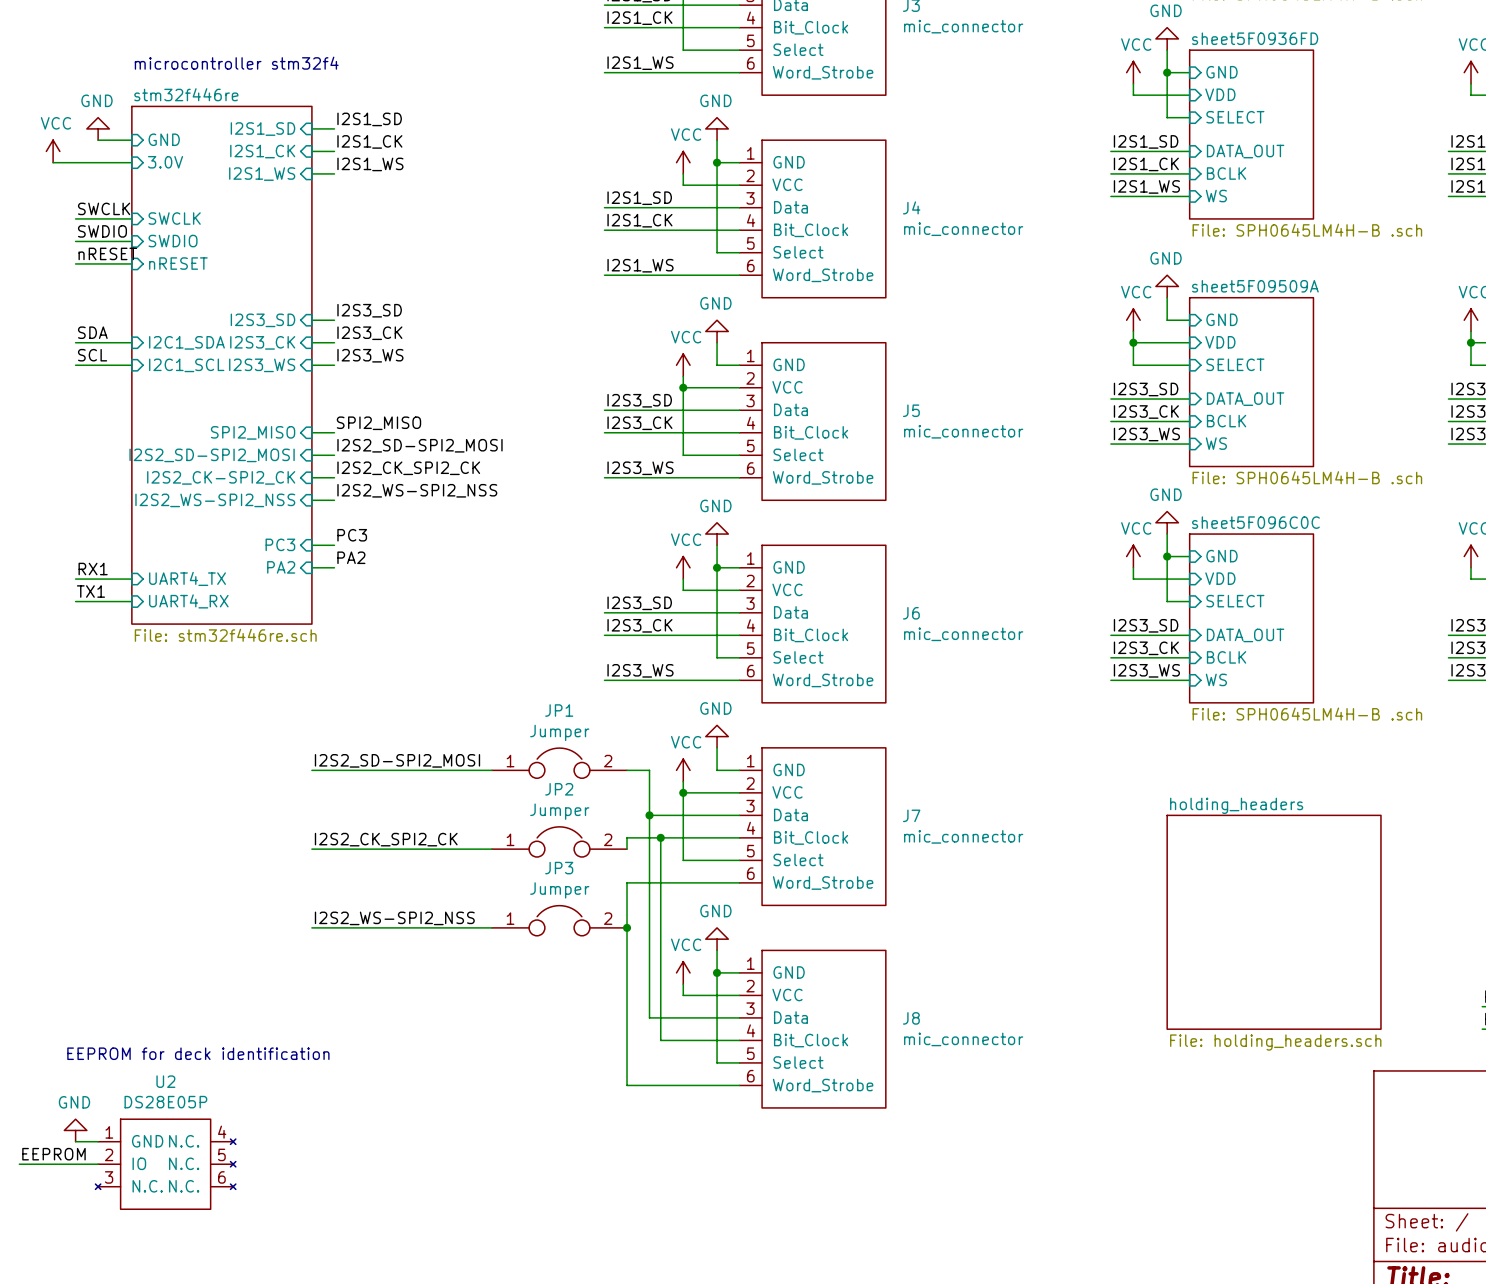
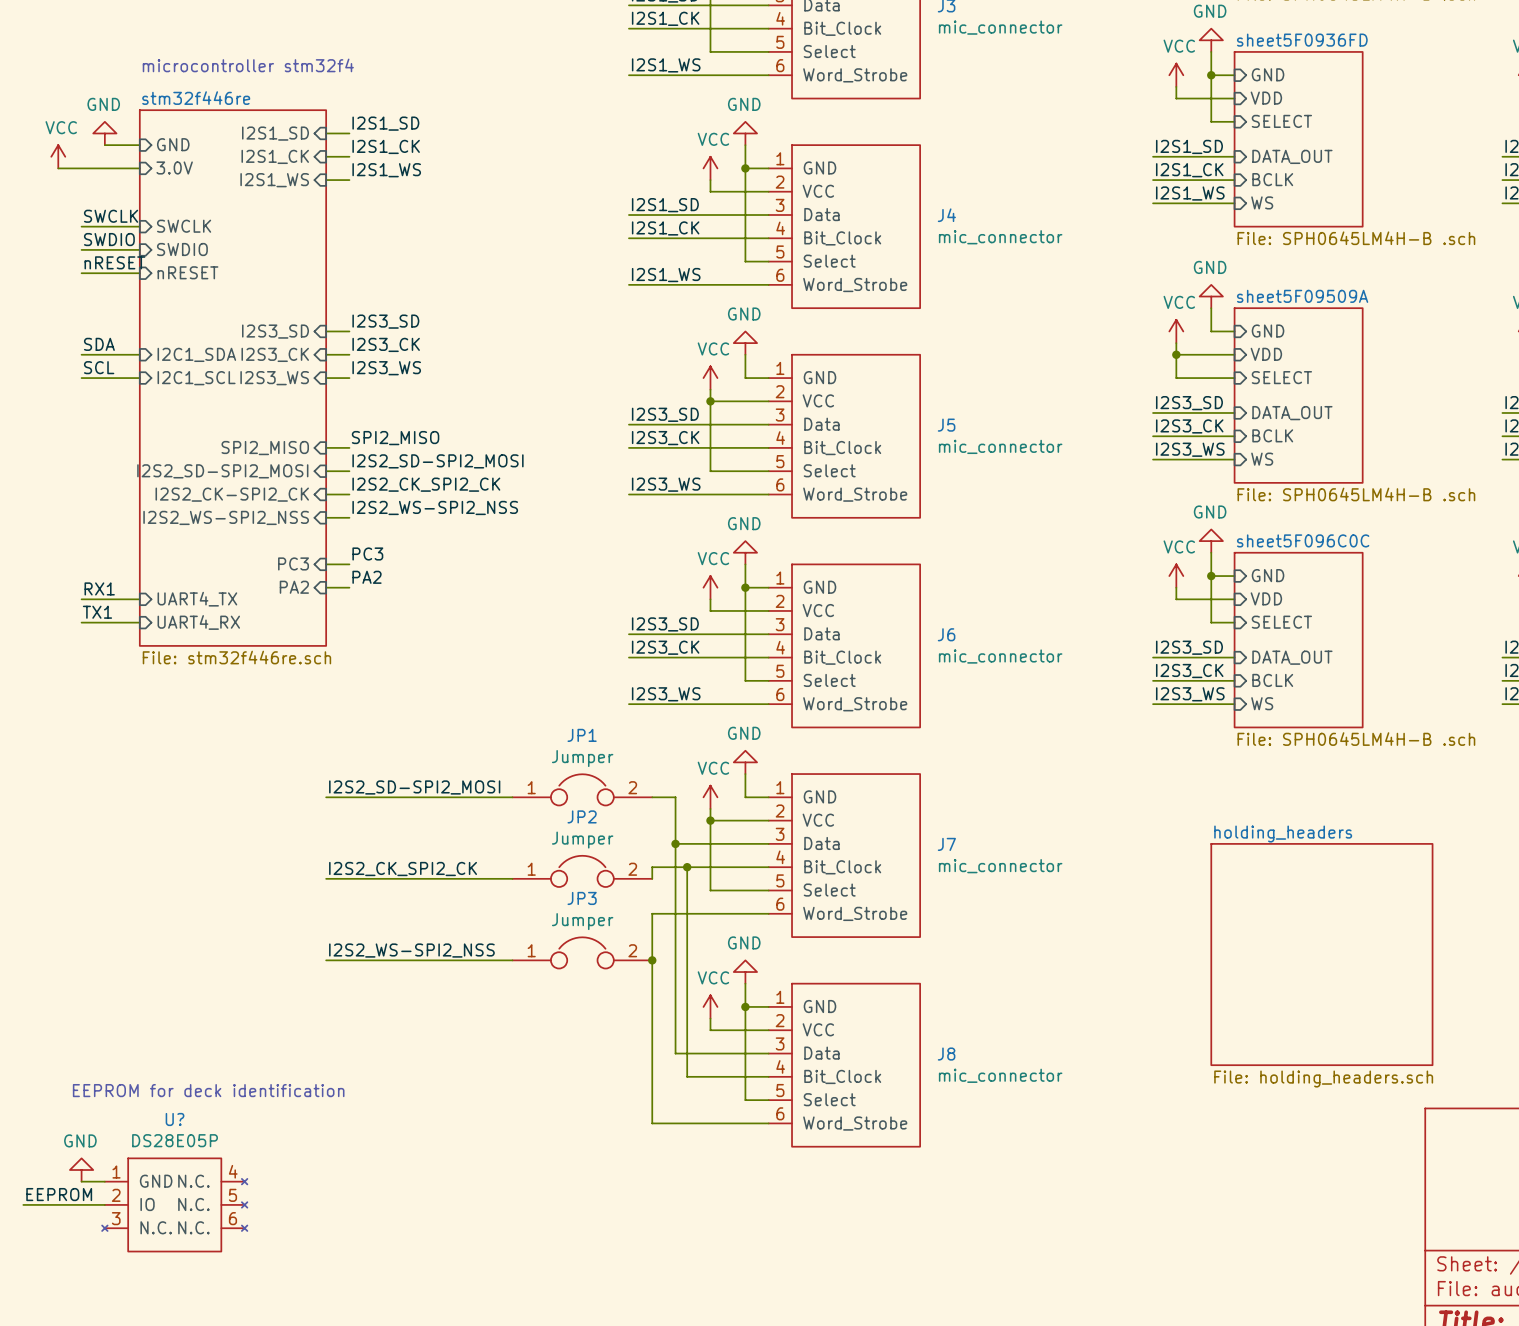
U2 name: U2 (165, 1081) -> U? (175, 1119)

